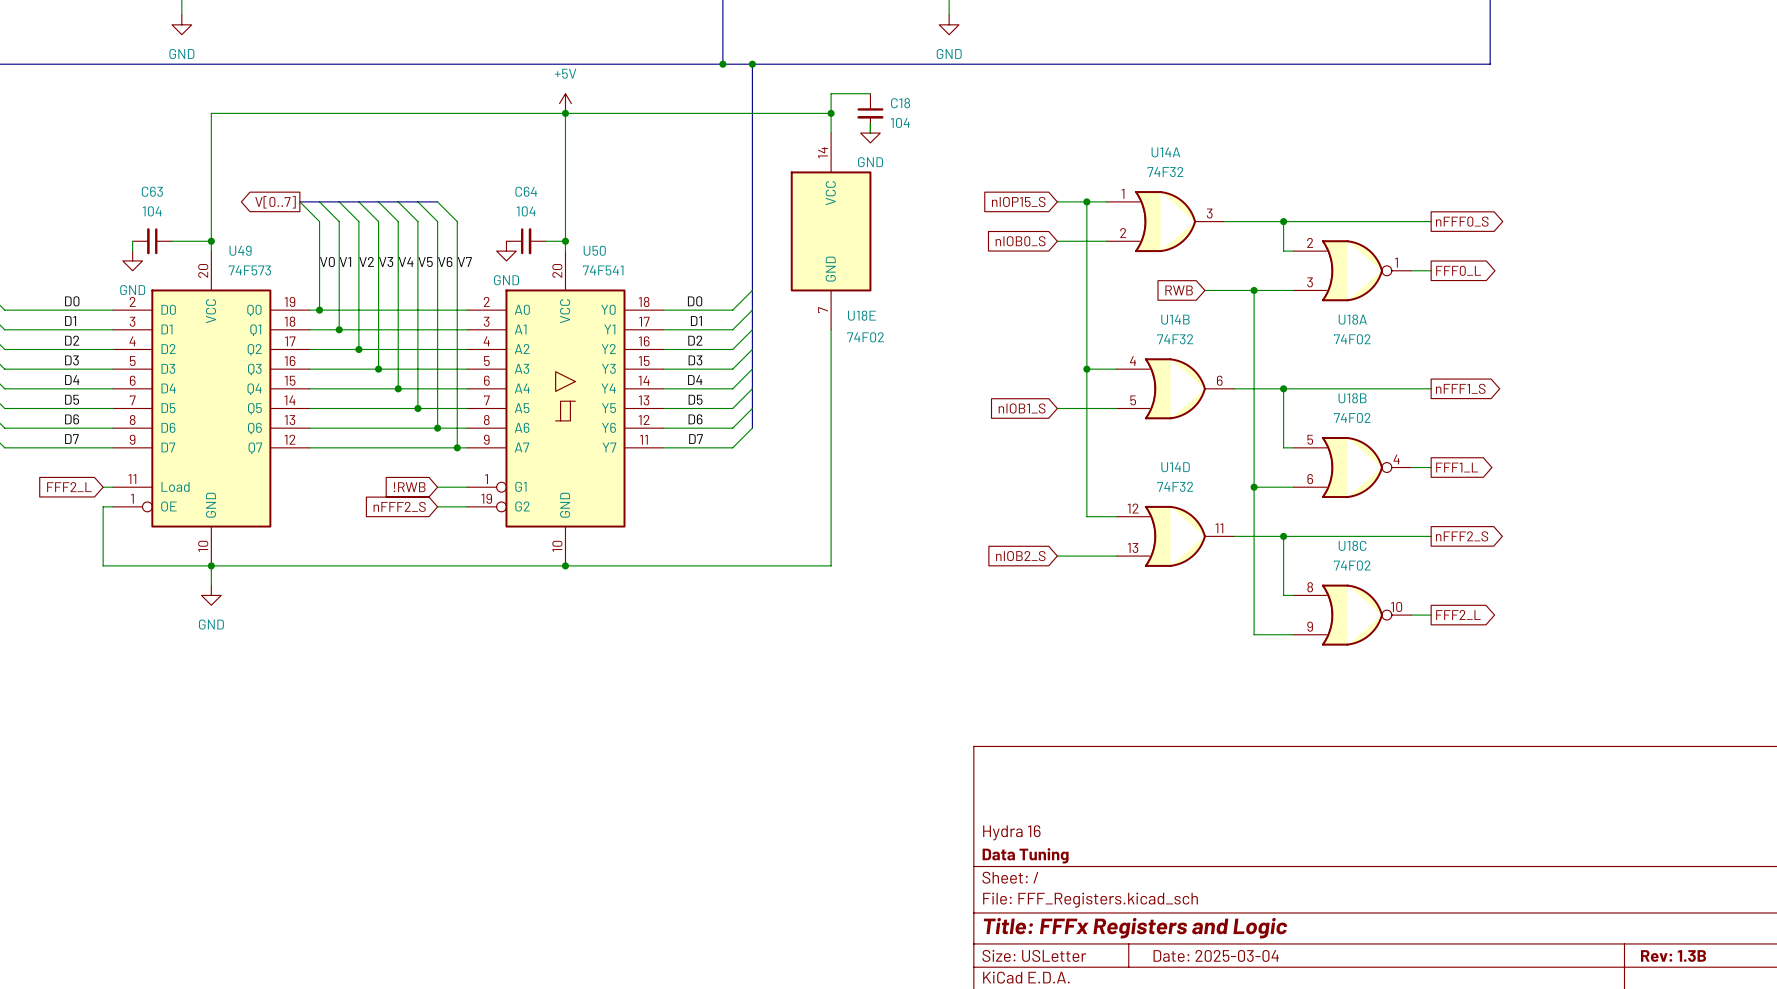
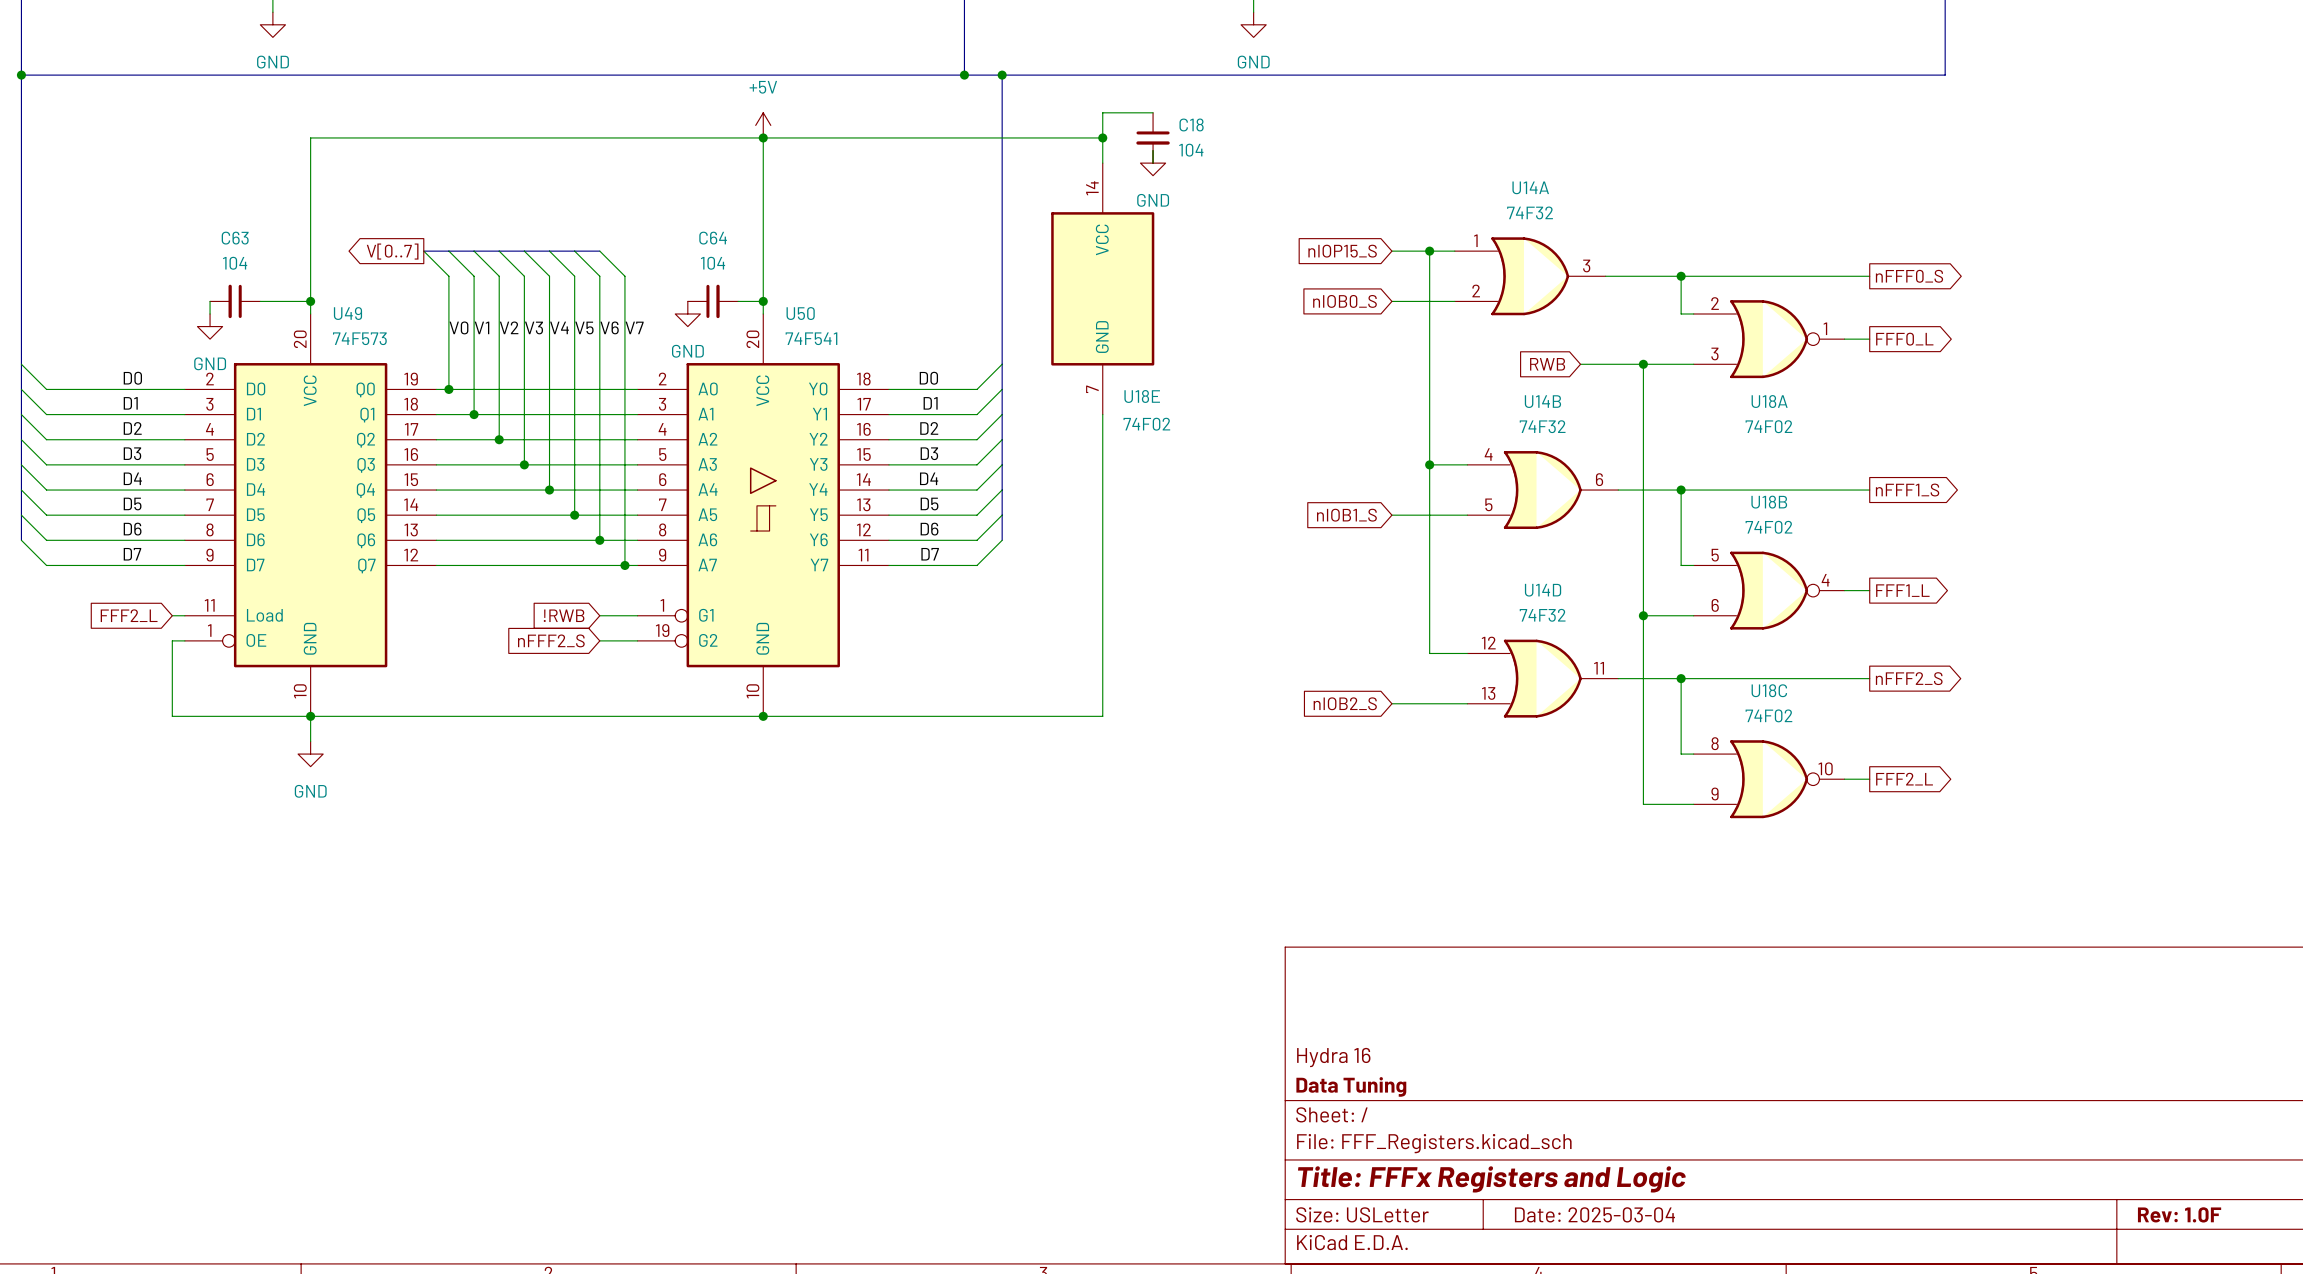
title block: Rev: 1.3B (1673, 955) -> Rev: 1.0F (2179, 1214)

